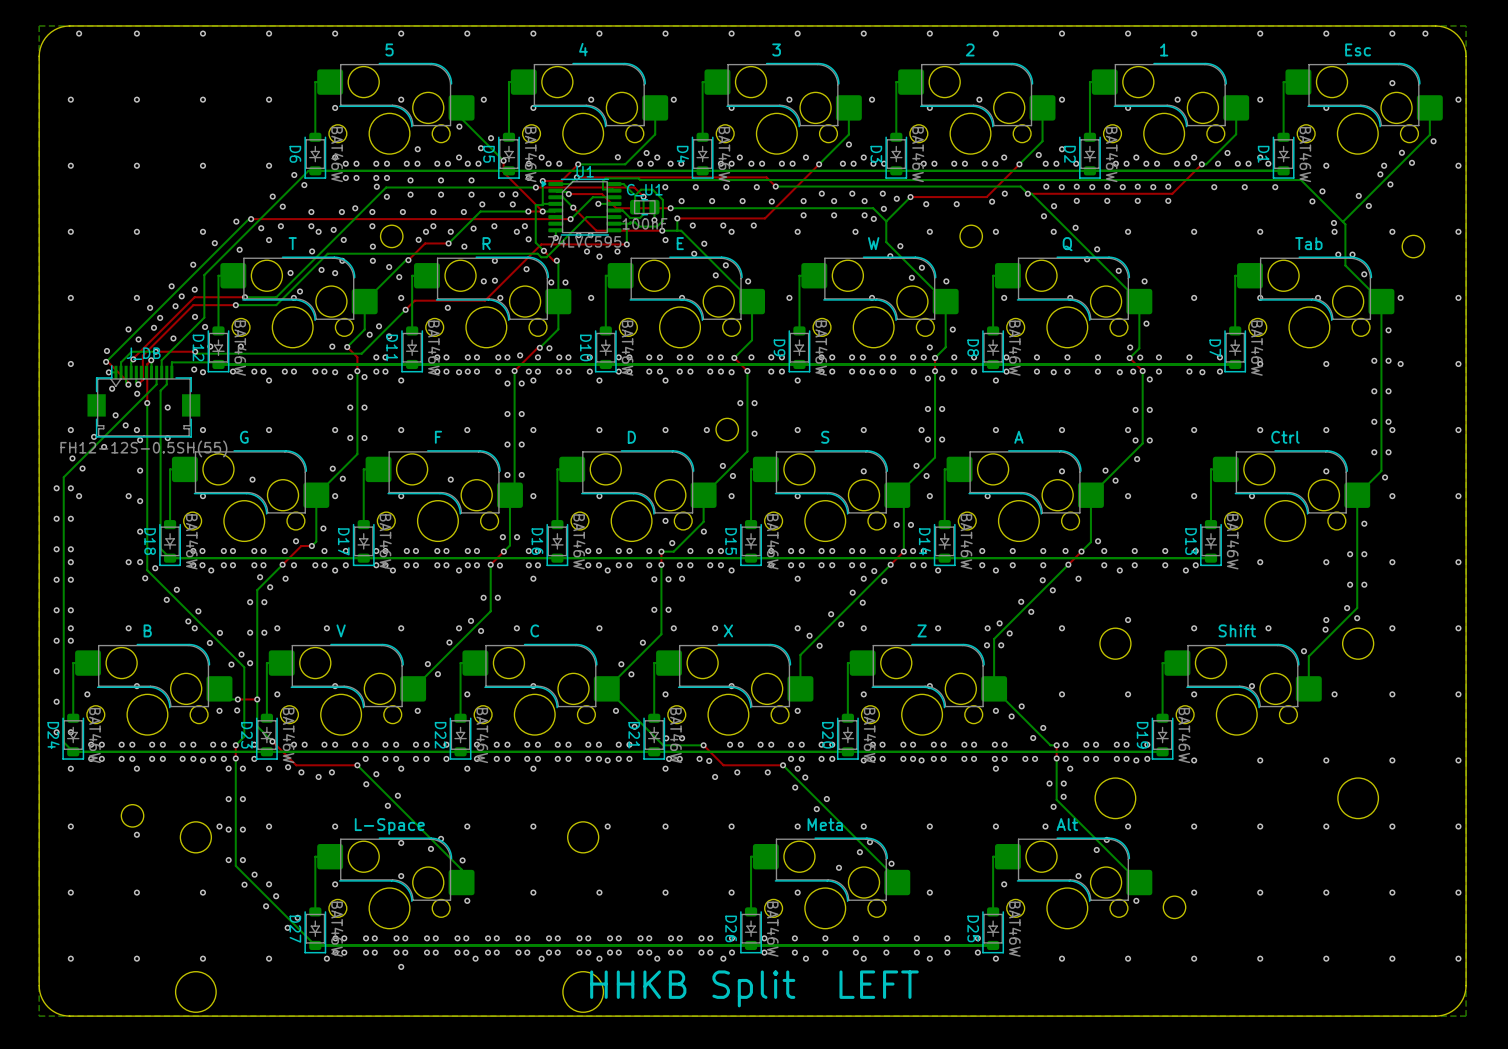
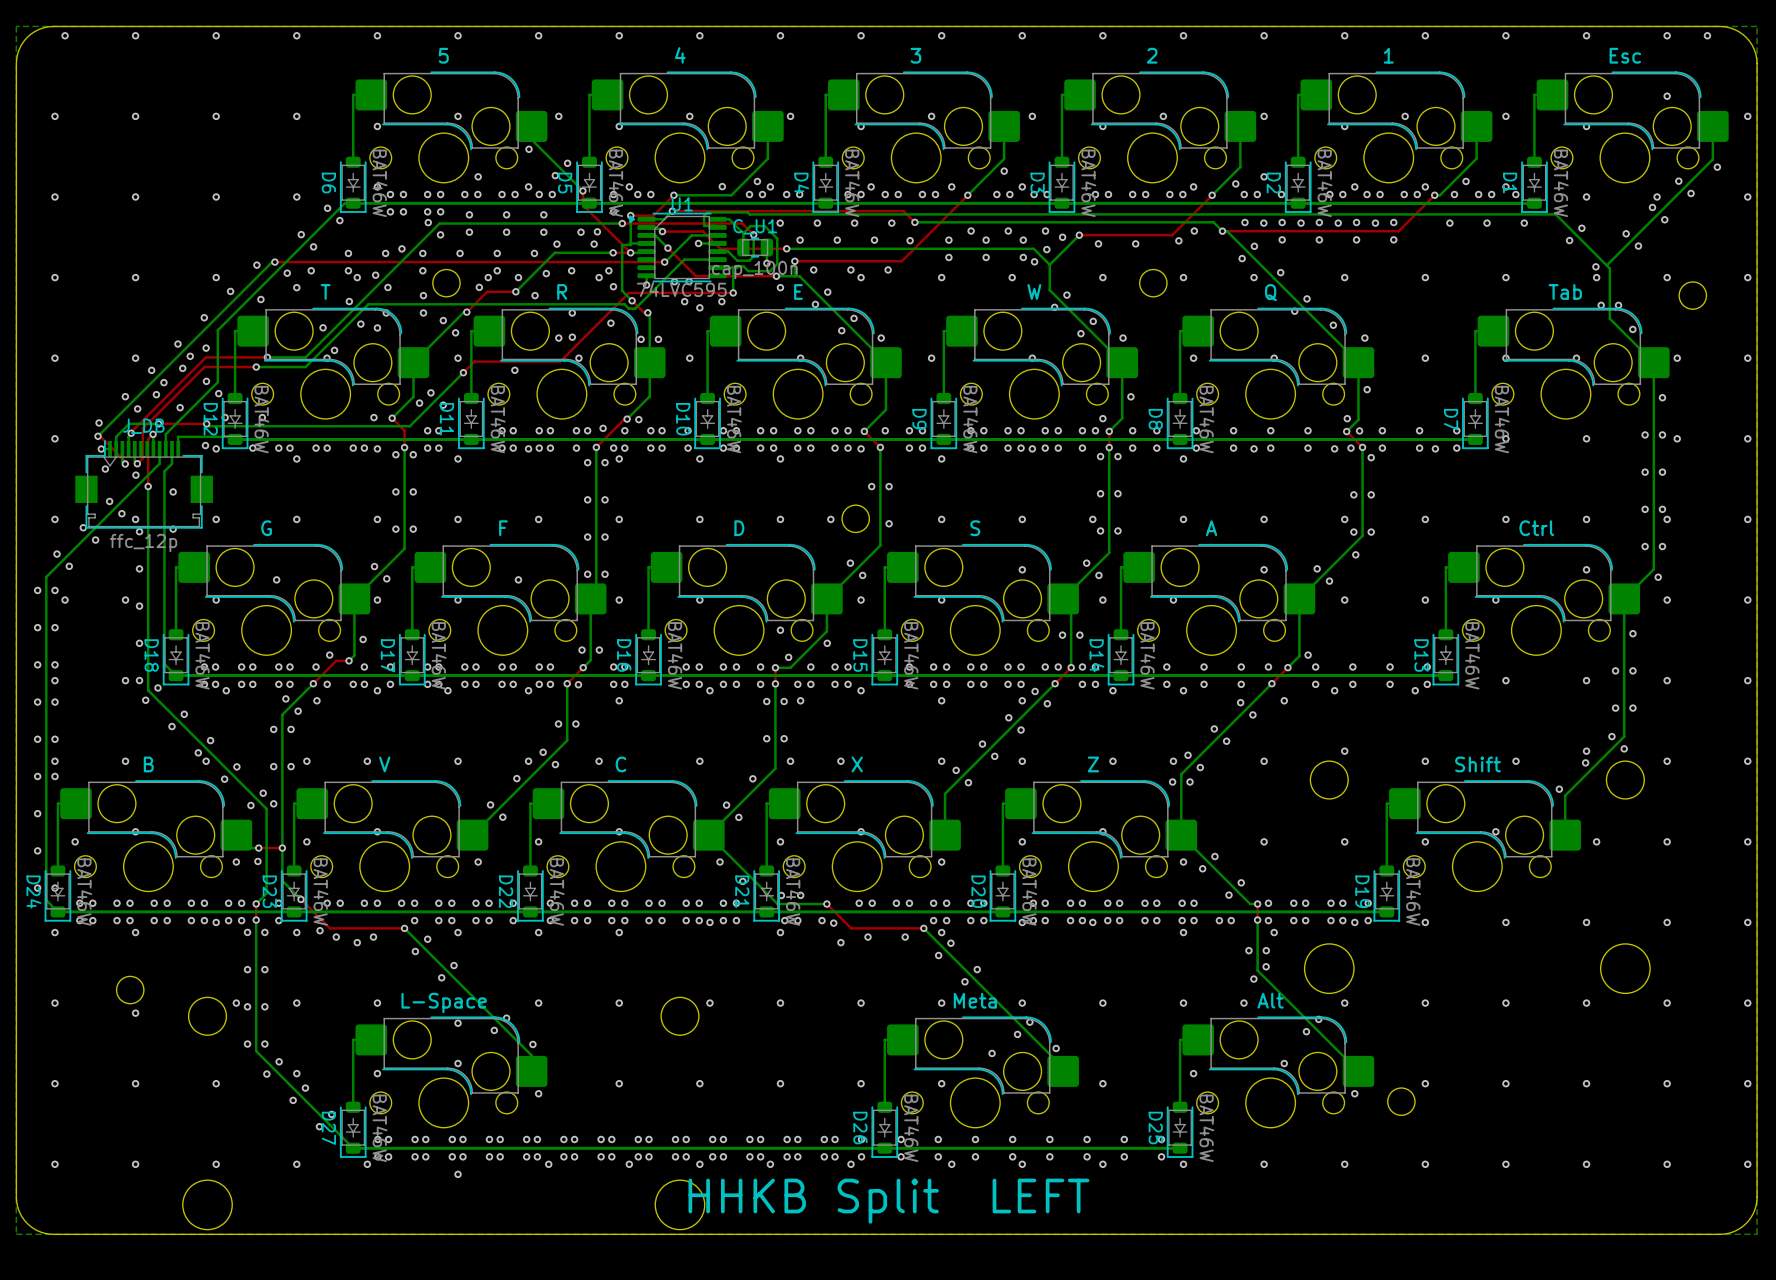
C_U1 value: 100nF (645, 223) -> cap_100n (754, 269)
J_DB value: FH12-12S-0.5SH(55) (143, 448) -> ffc_12p (143, 543)

